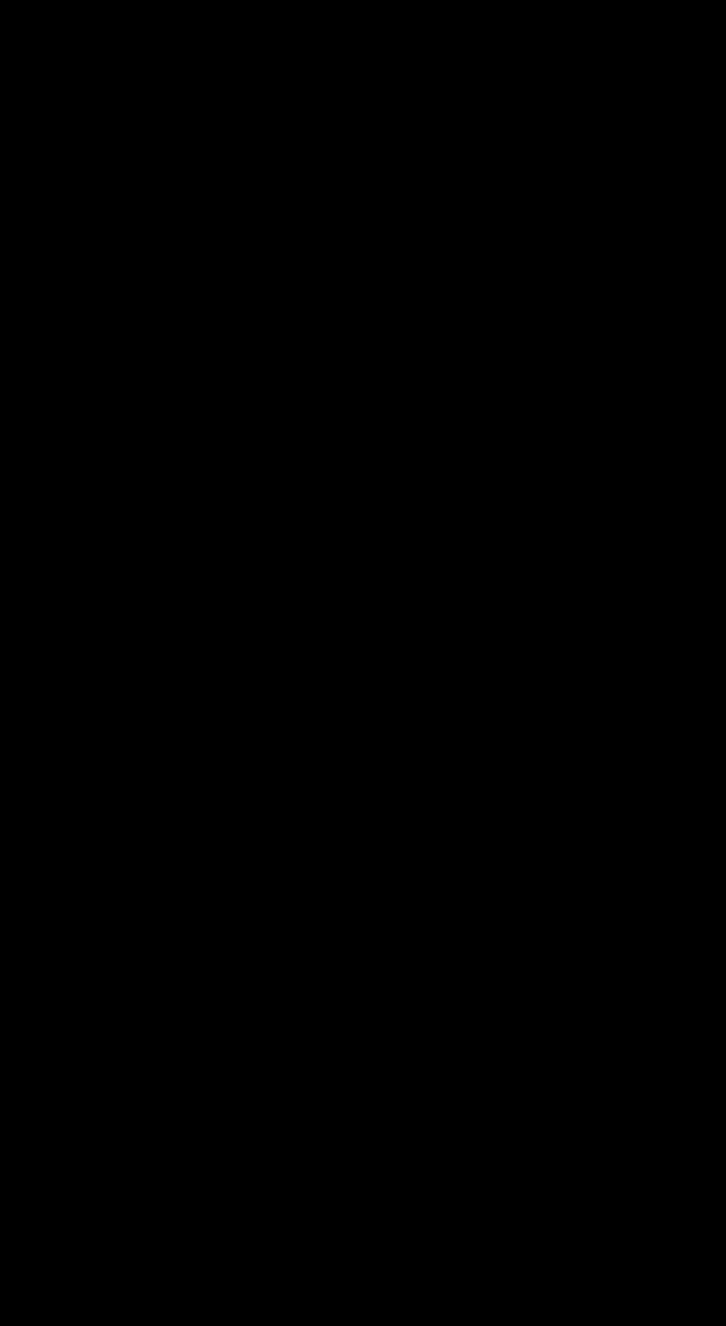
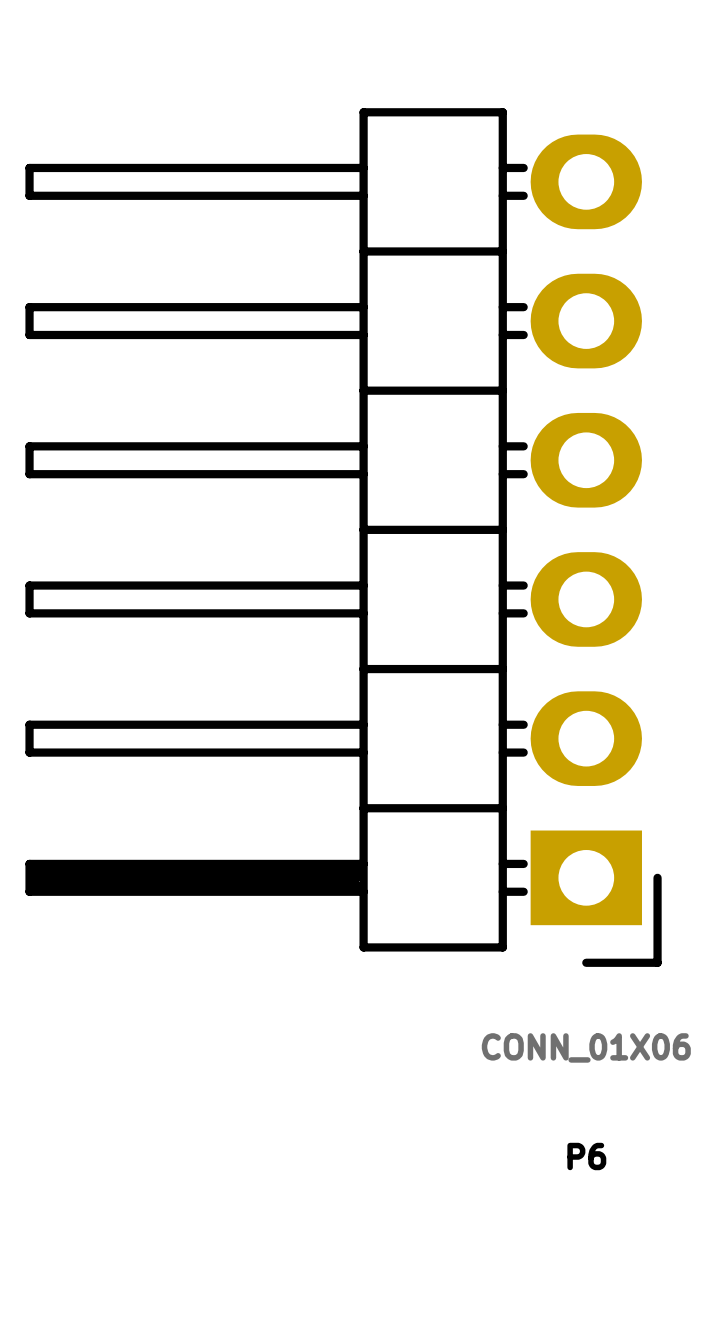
P6: none -> CONN_01X06 (343, 537)

